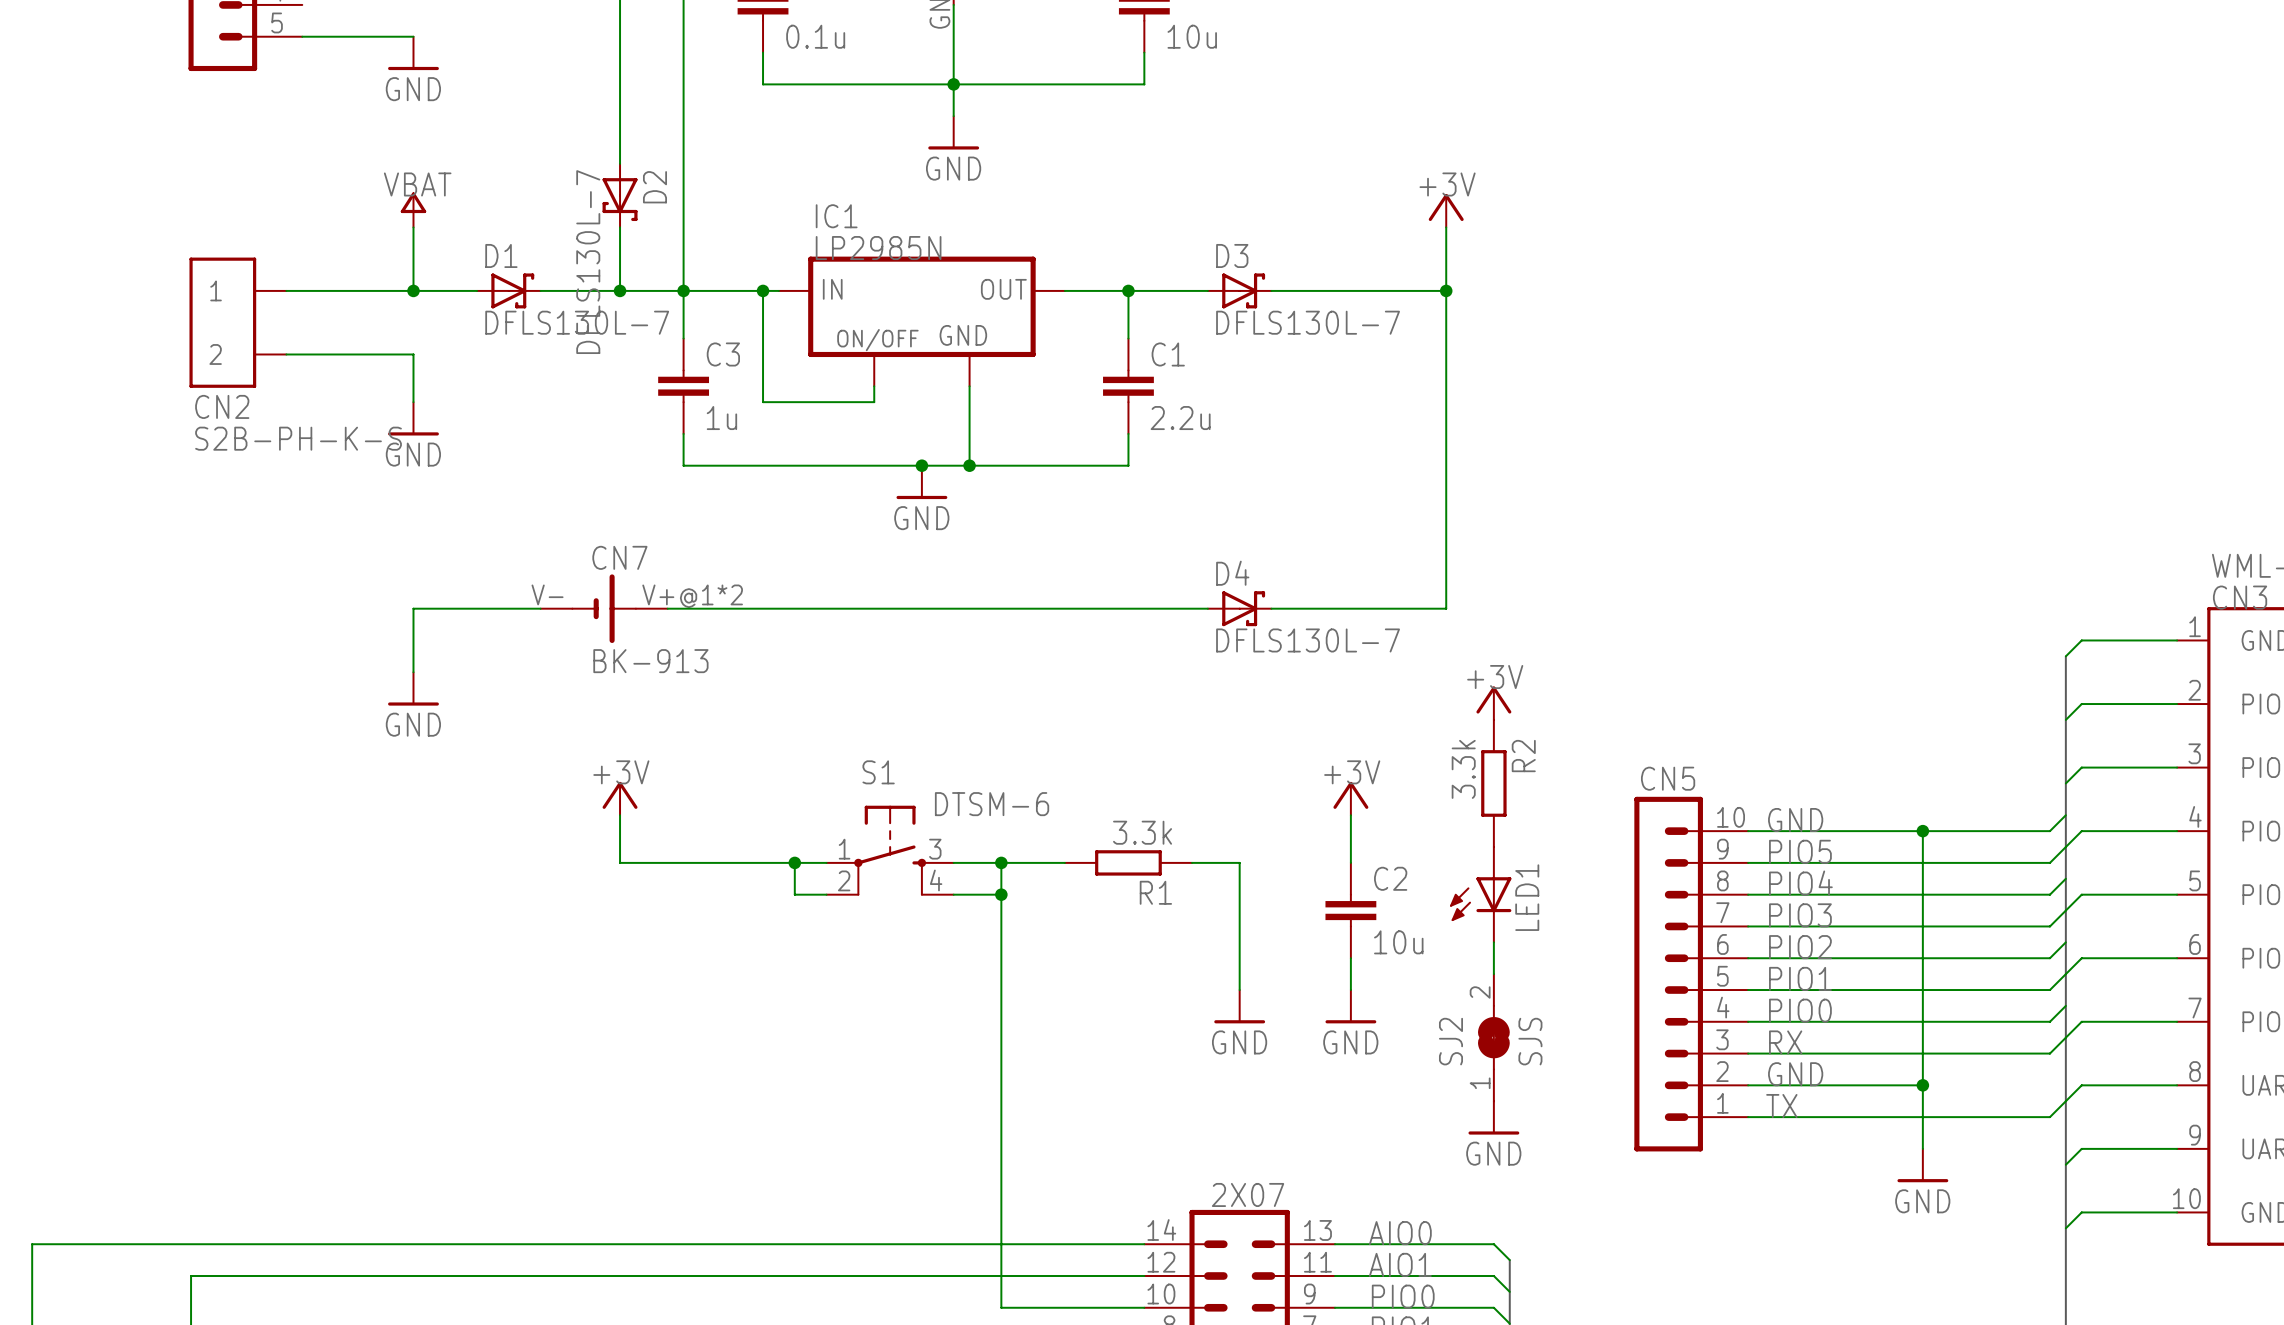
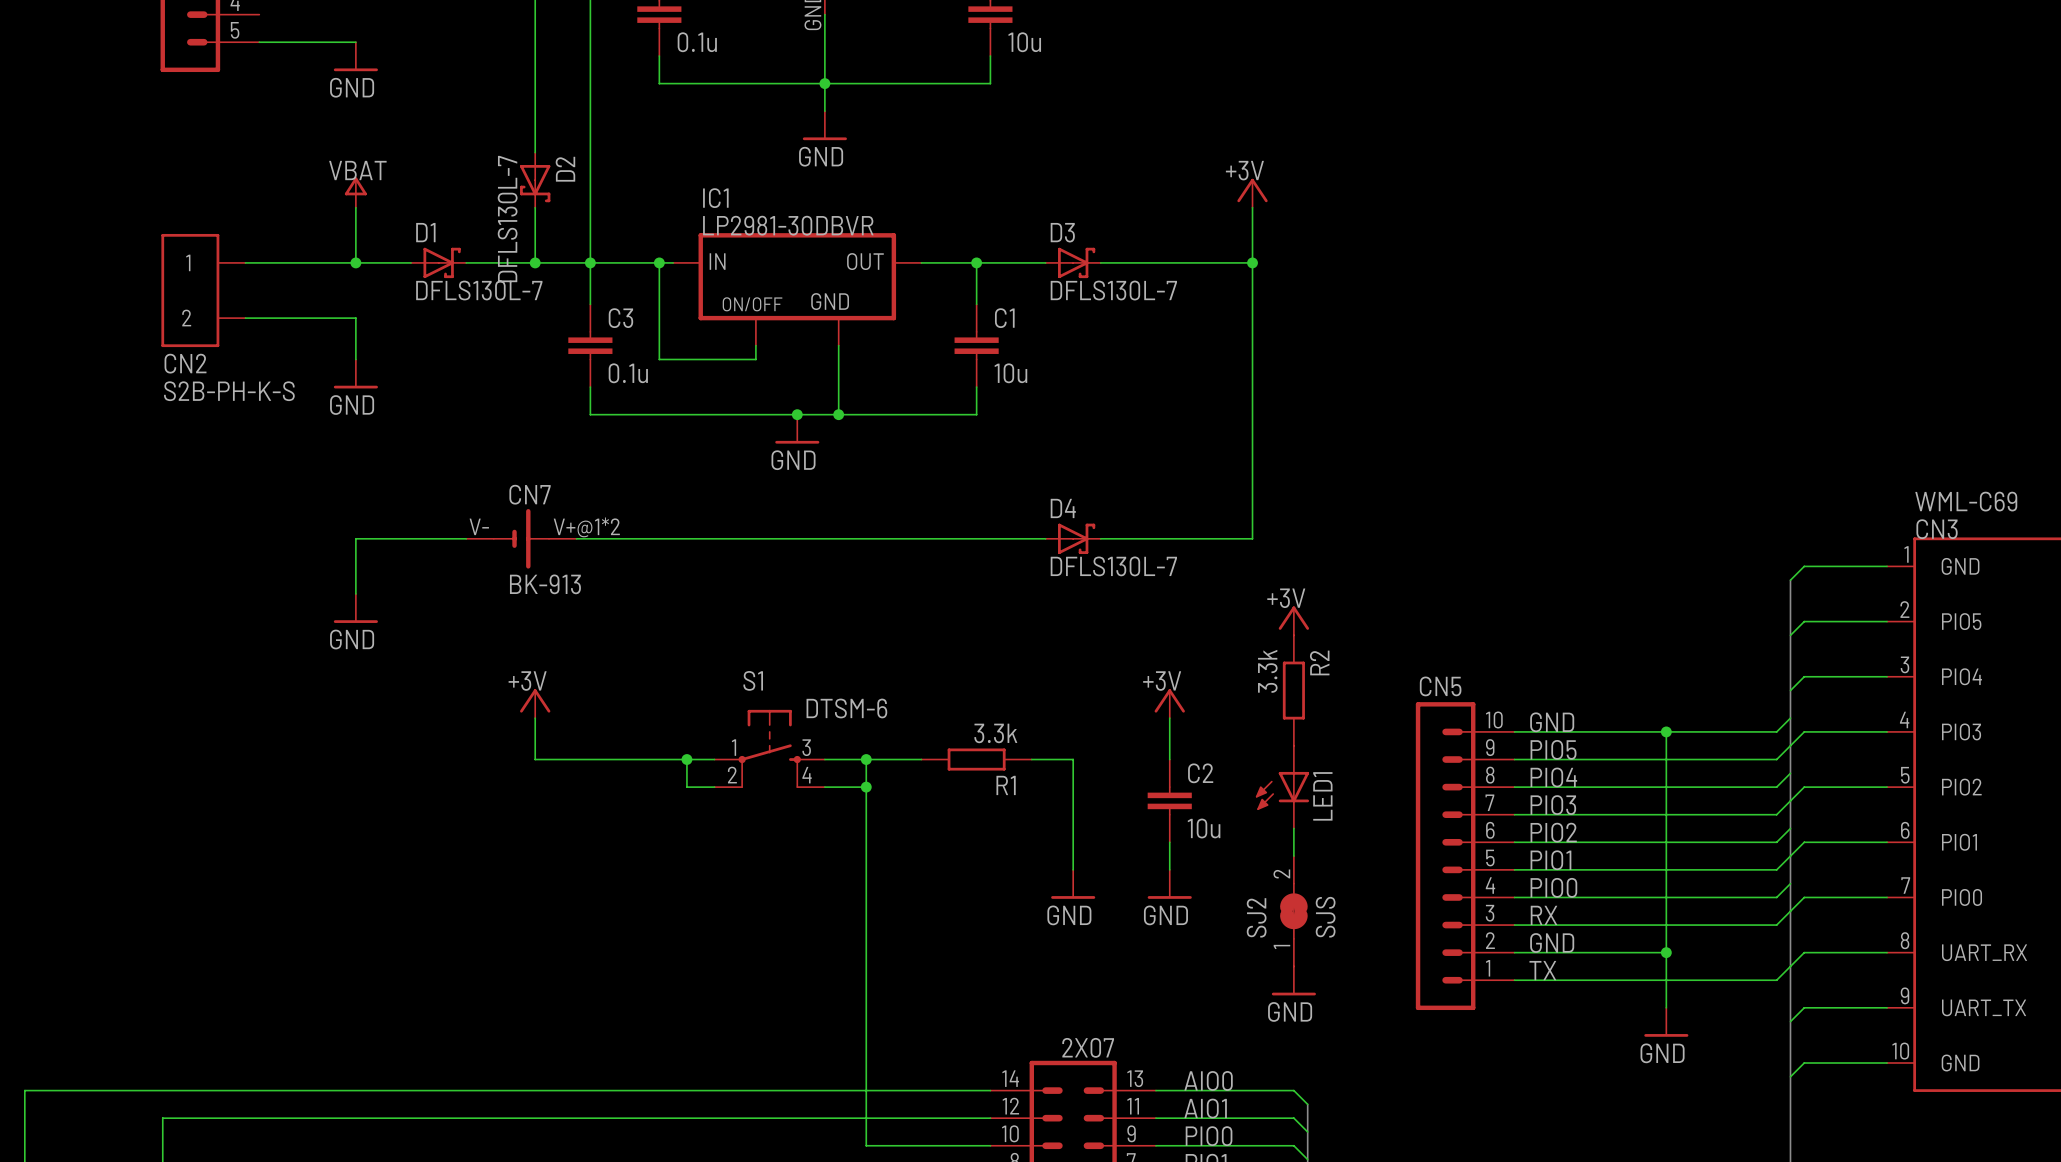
IC1 value: LP2985N (878, 248) -> LP2981-30DBVR (788, 225)
C3 value: 1u (721, 418) -> 0.1u (628, 373)
C1 value: 2.2u (1180, 418) -> 10u (1010, 373)

